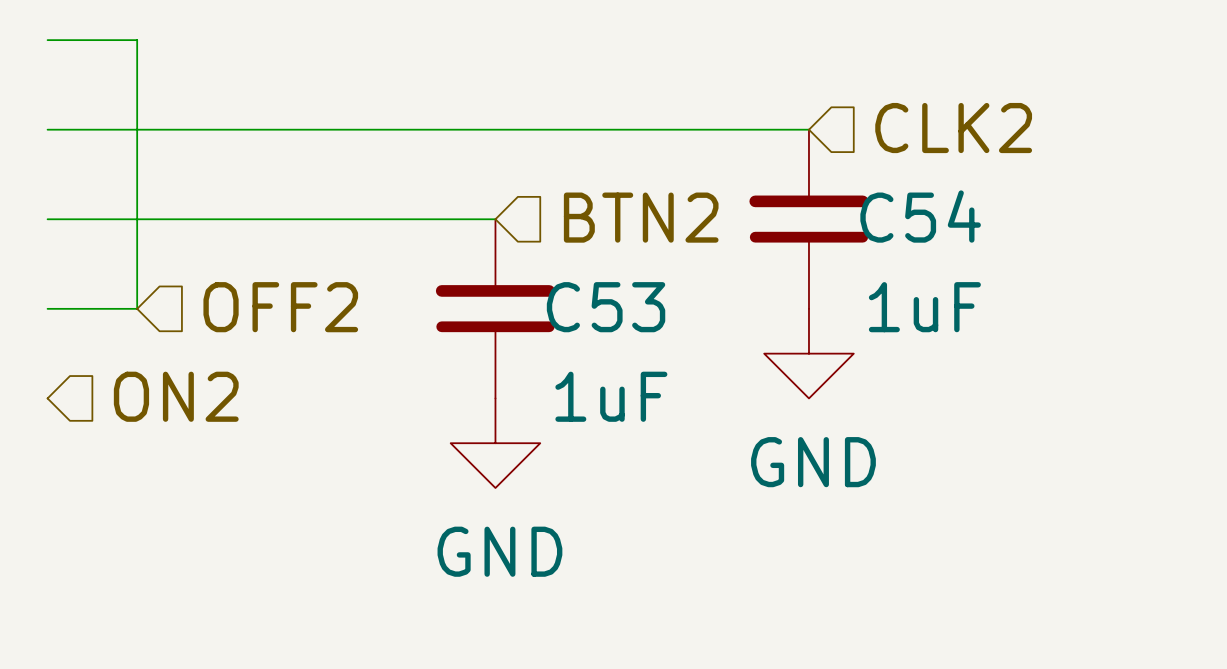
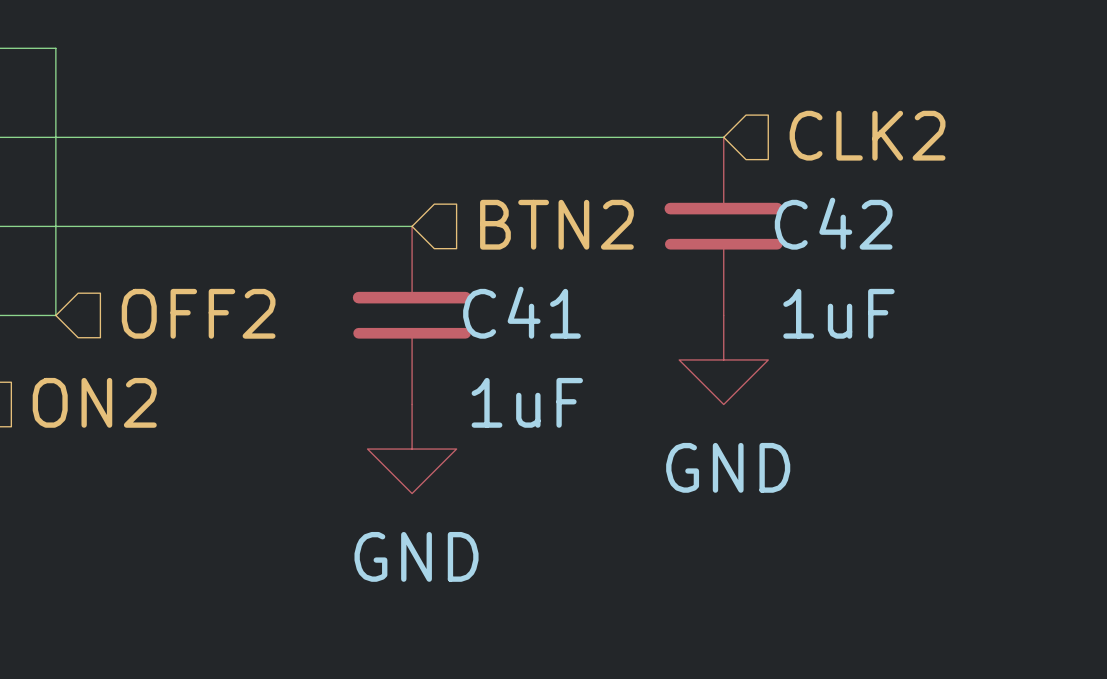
C54 name: C54 (920, 216) -> C42 (833, 223)
C53 name: C53 (606, 307) -> C41 (521, 312)

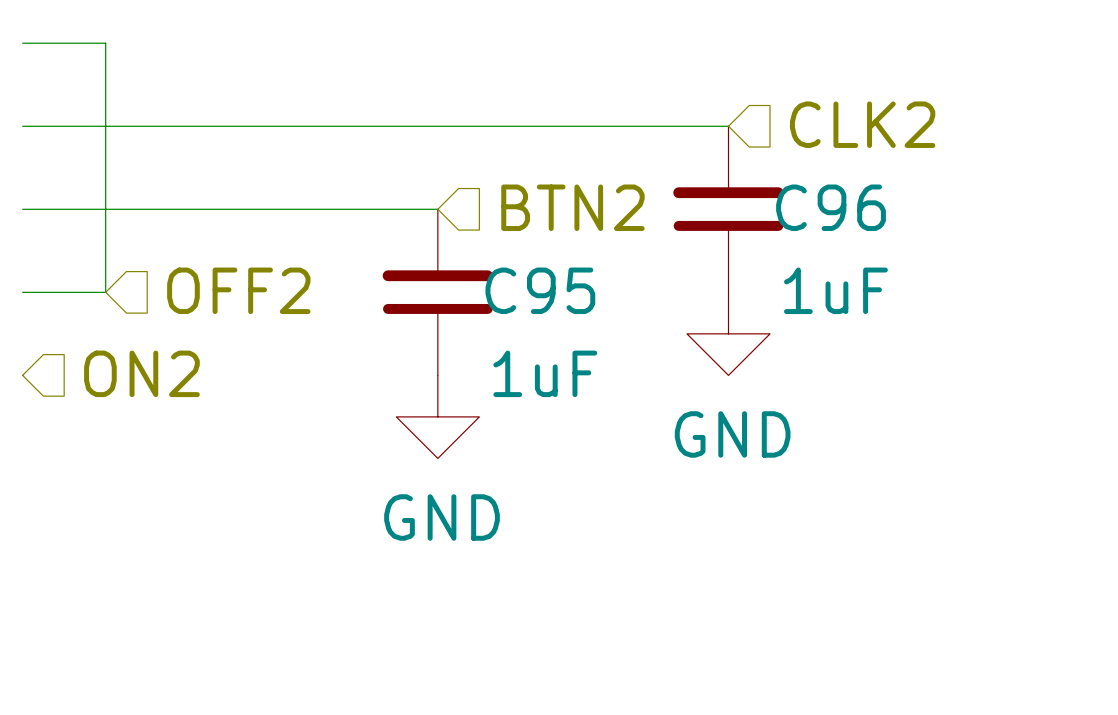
C42 name: C42 (833, 223) -> C96 (831, 207)
C41 name: C41 (521, 312) -> C95 (540, 290)

